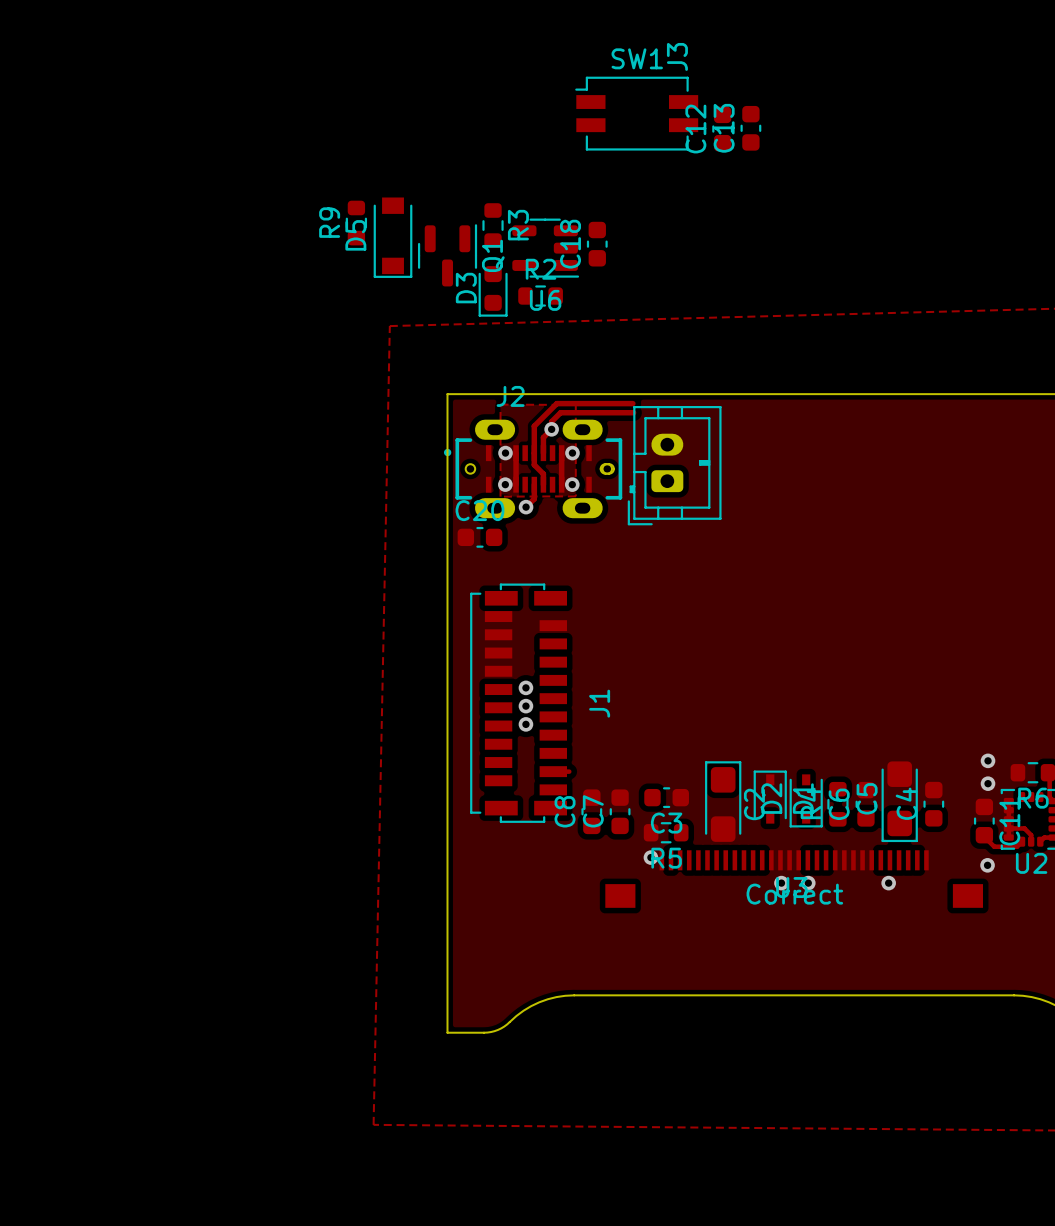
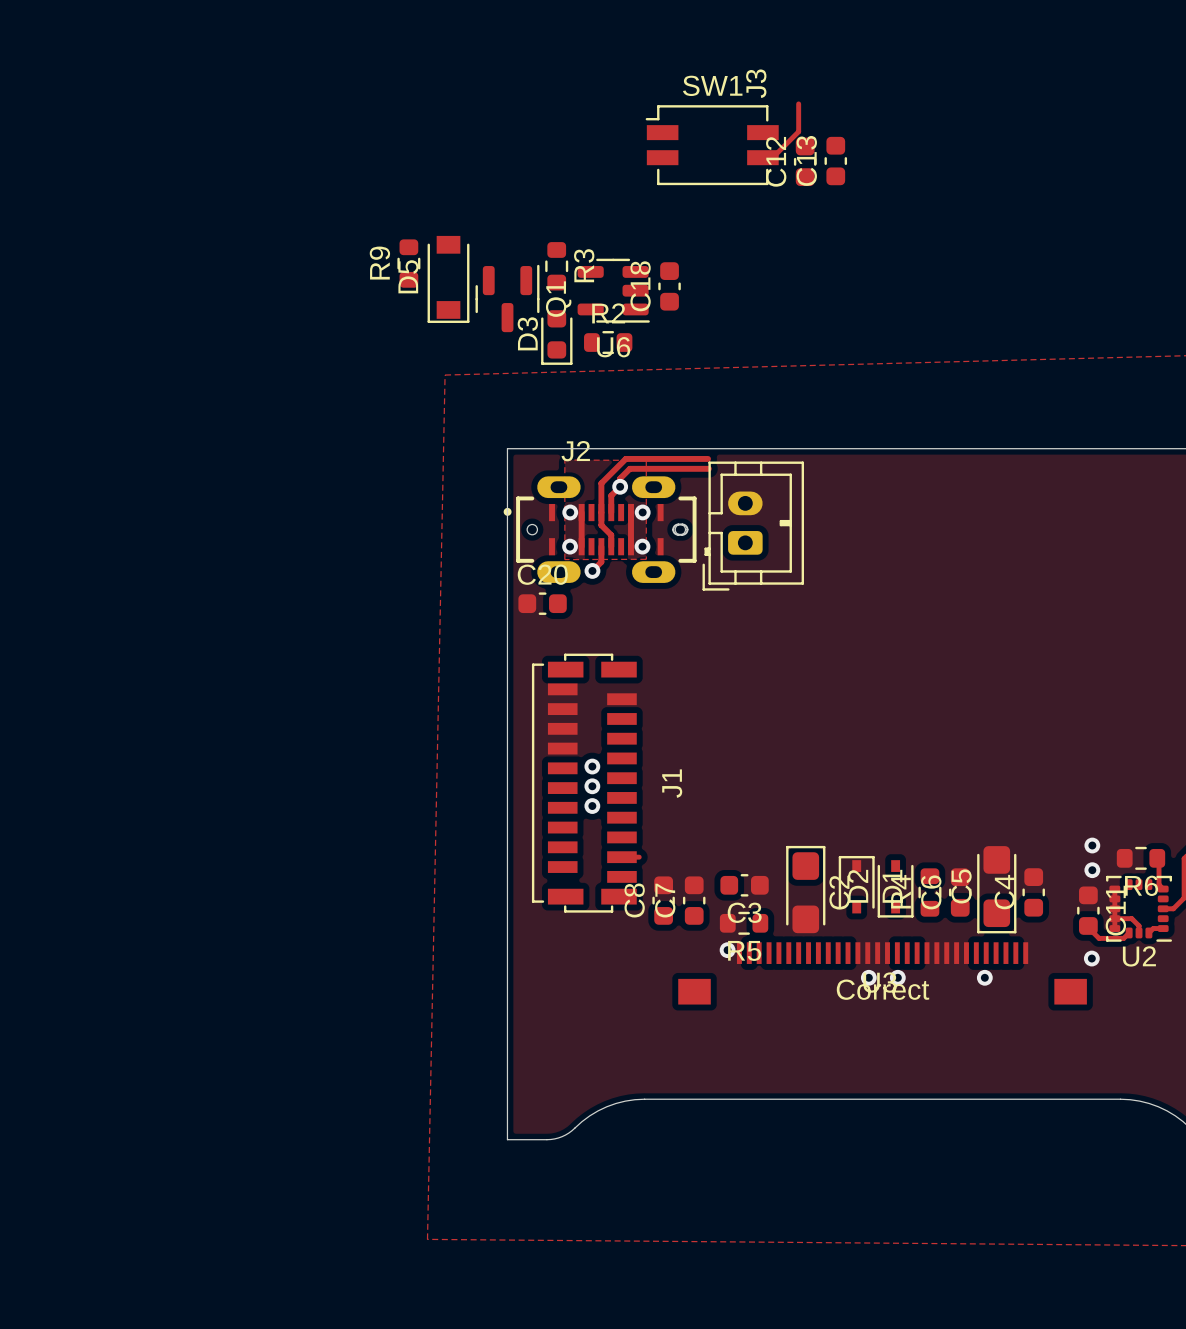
track: none -> (798, 103) (798, 131) (772, 157)

